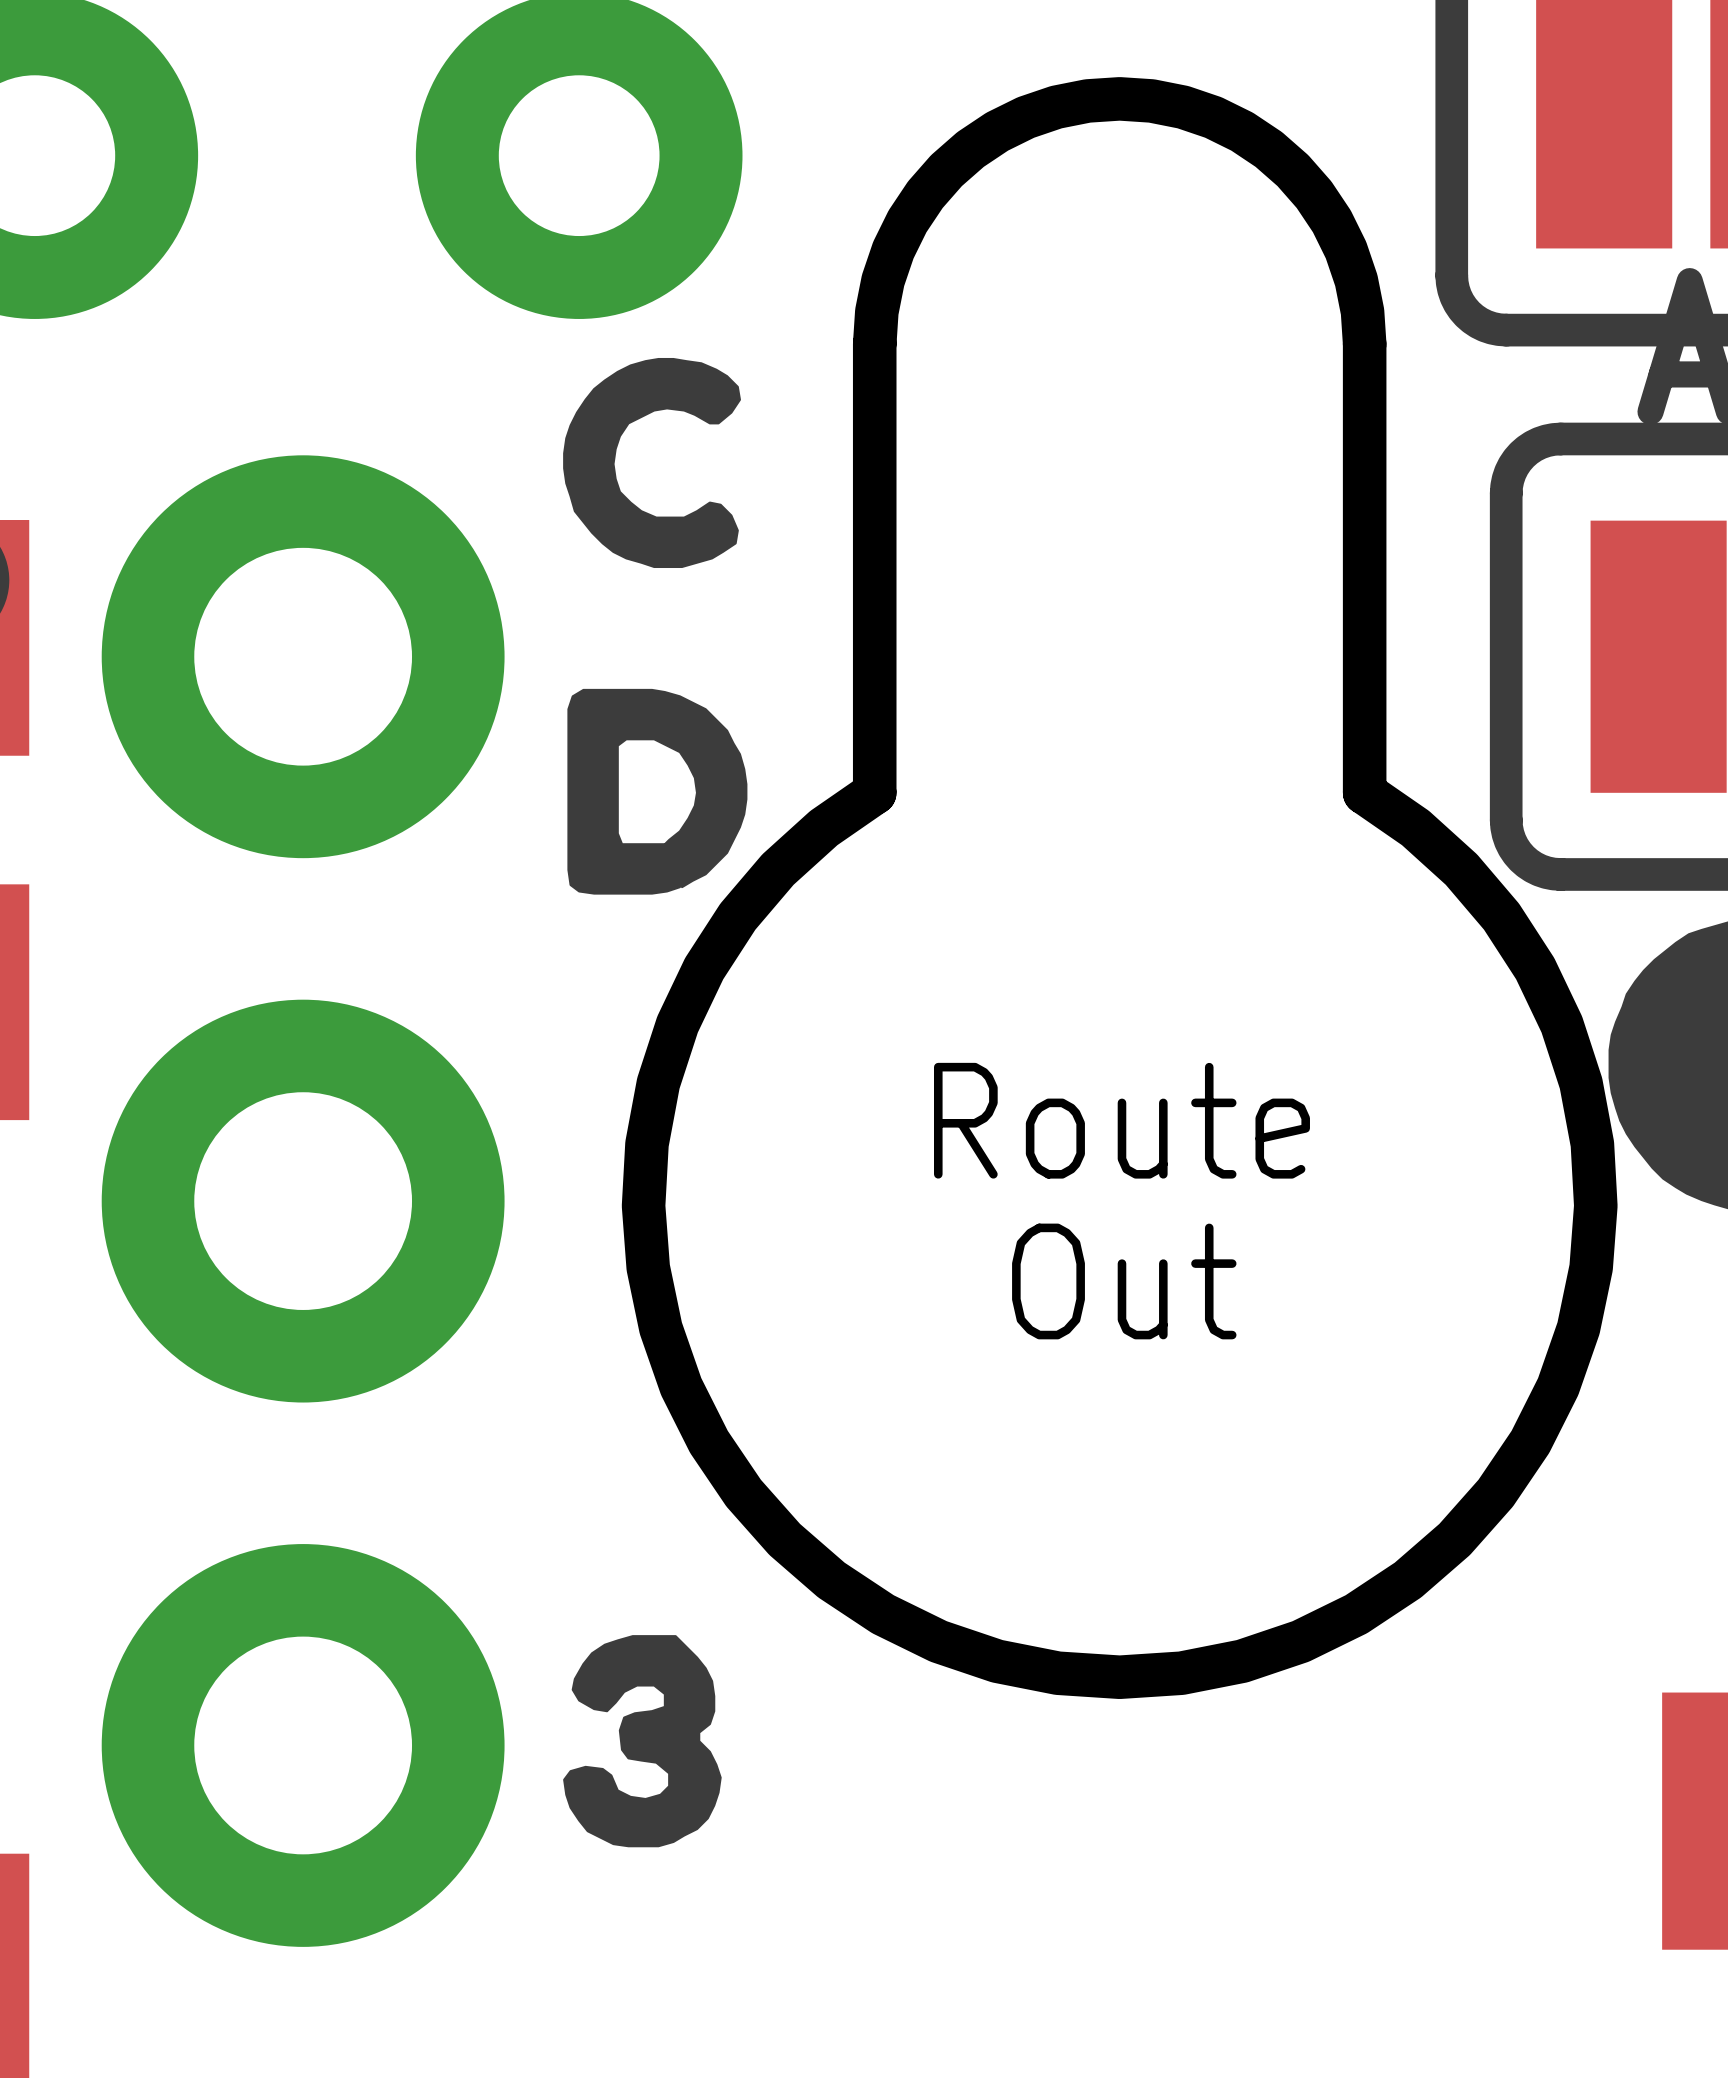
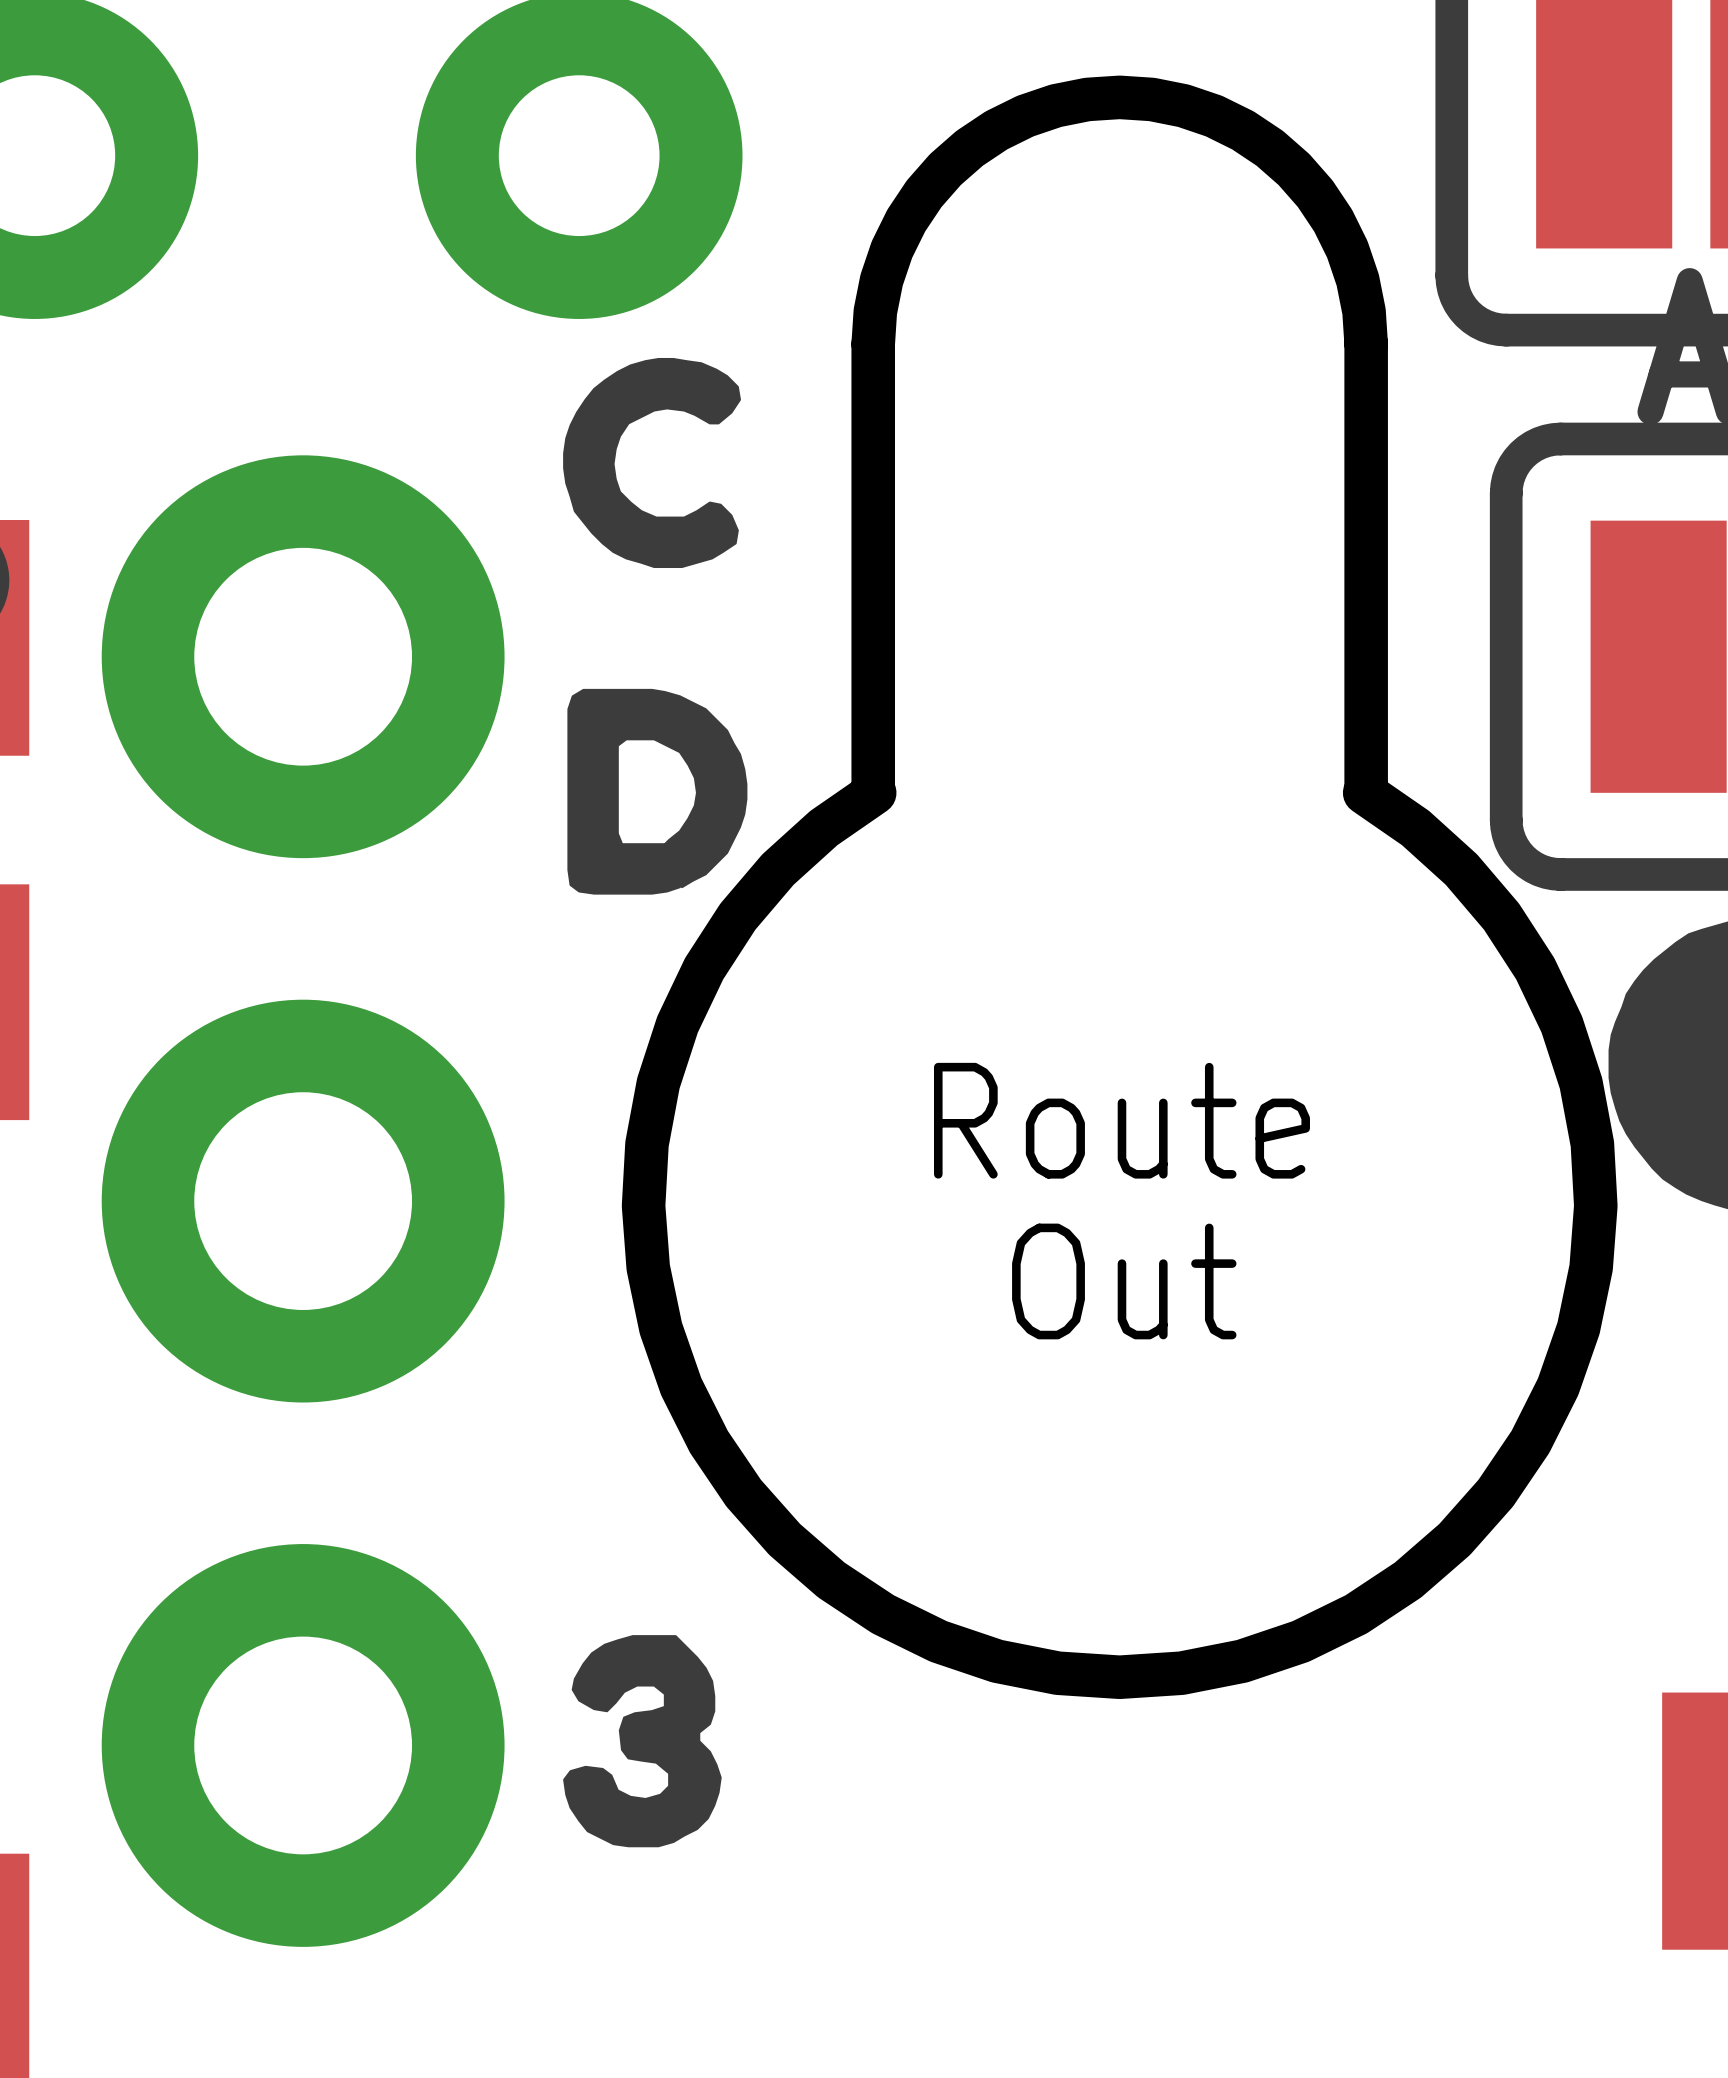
drawing shape: [621, 77, 1618, 1700] -> [621, 75, 1618, 1700]

